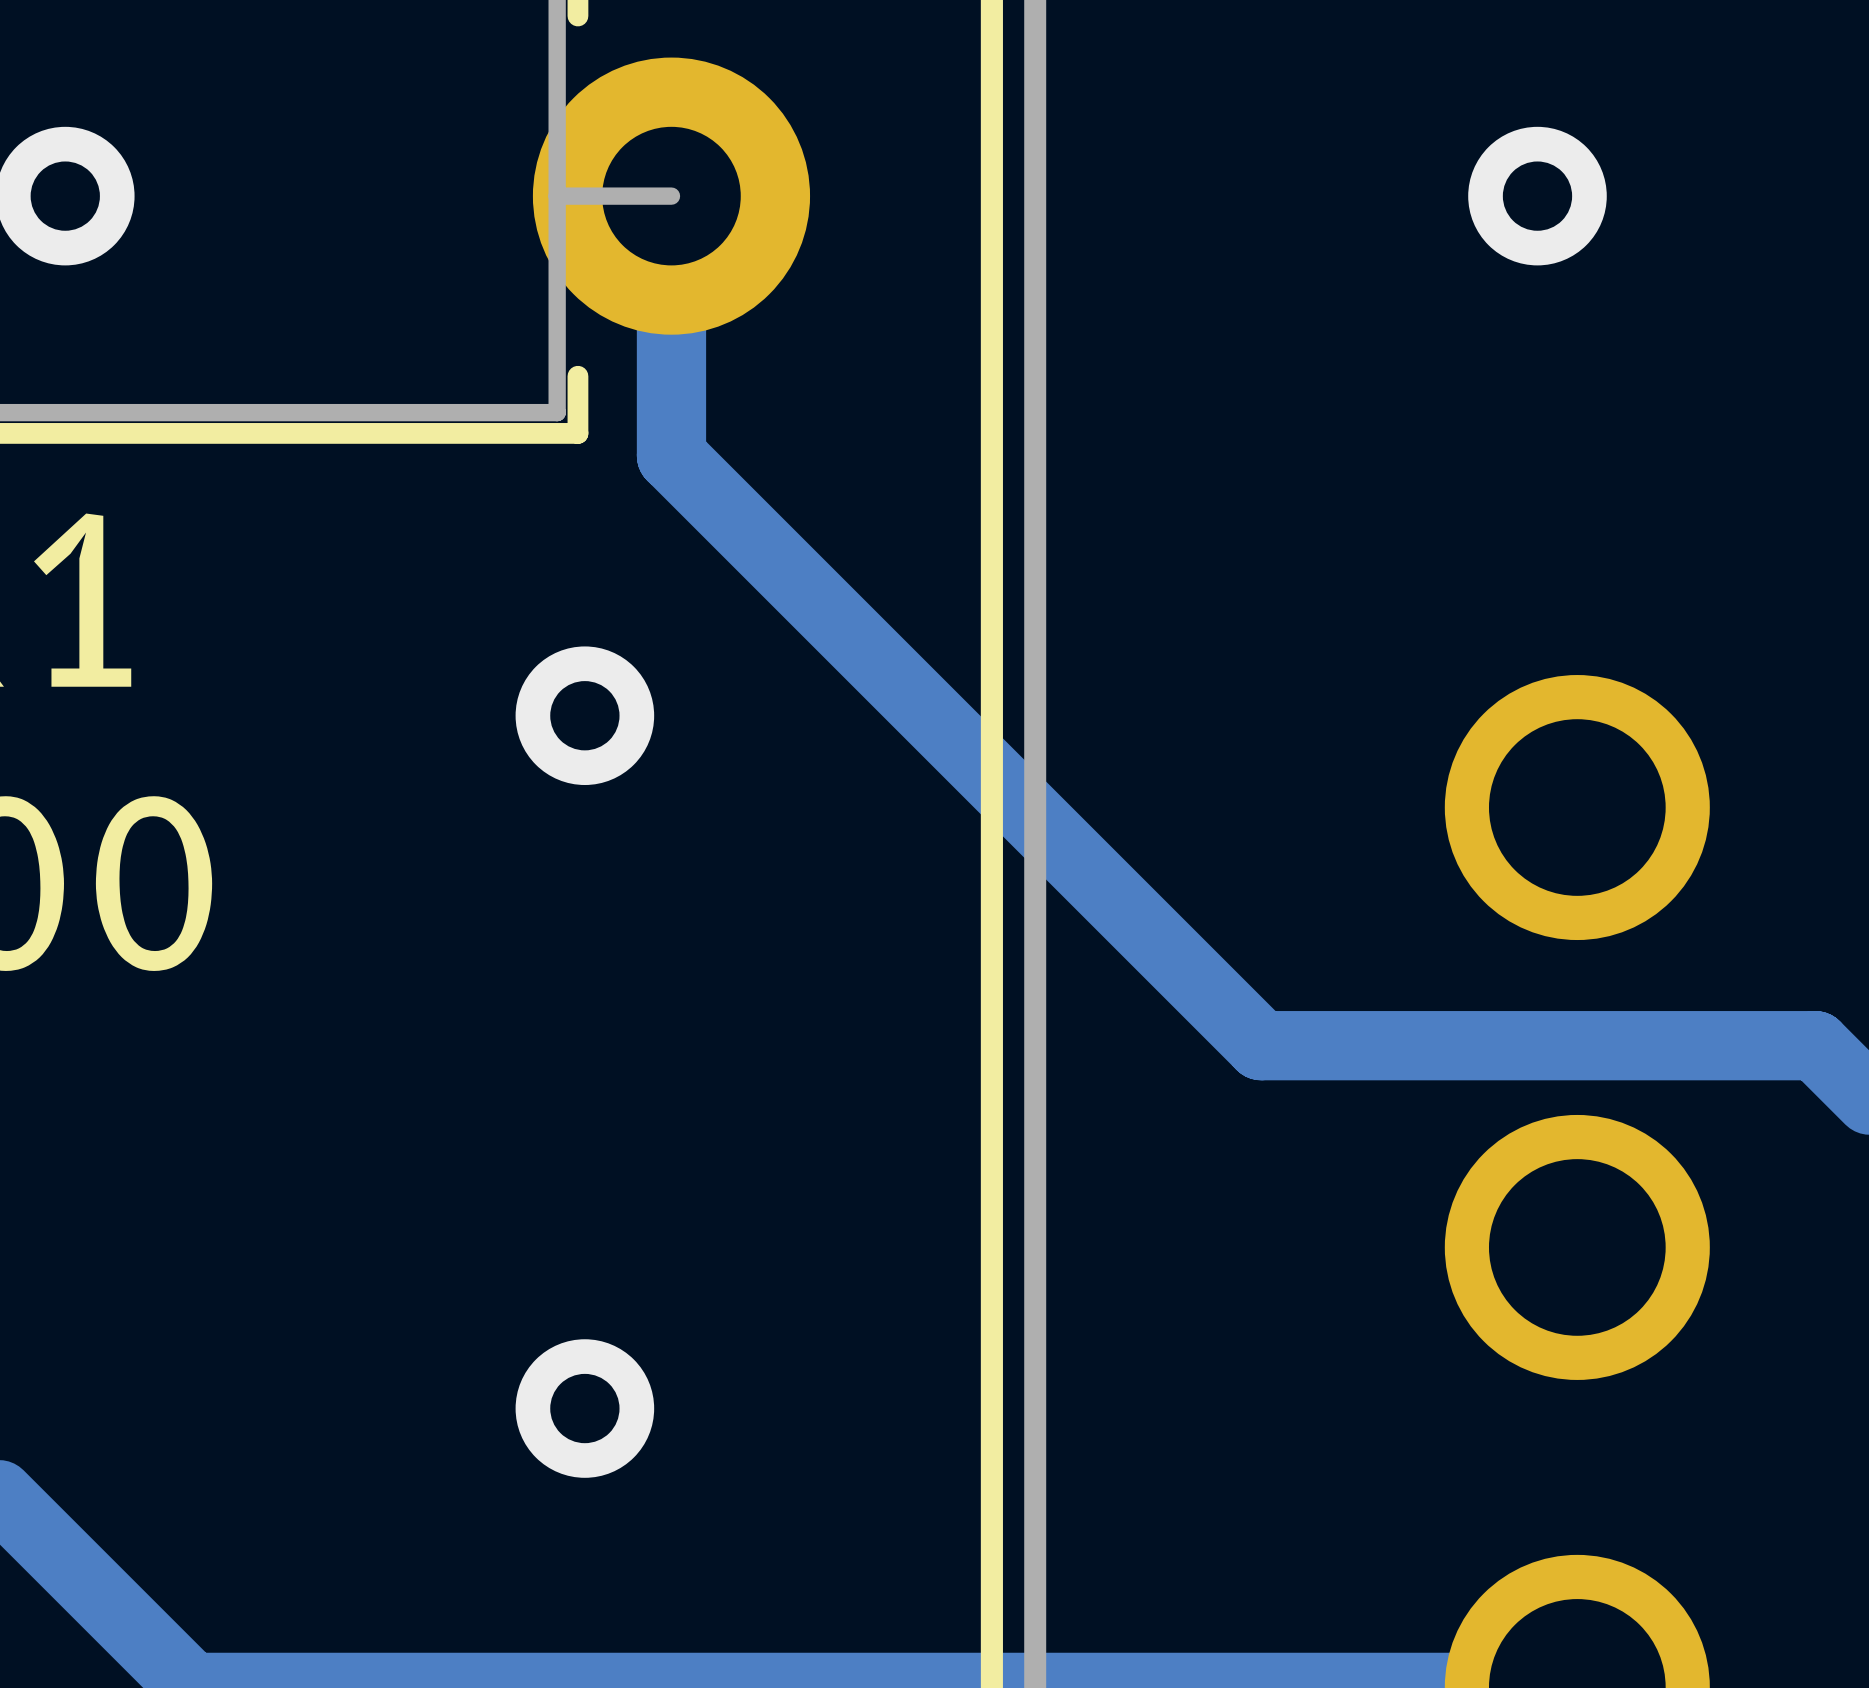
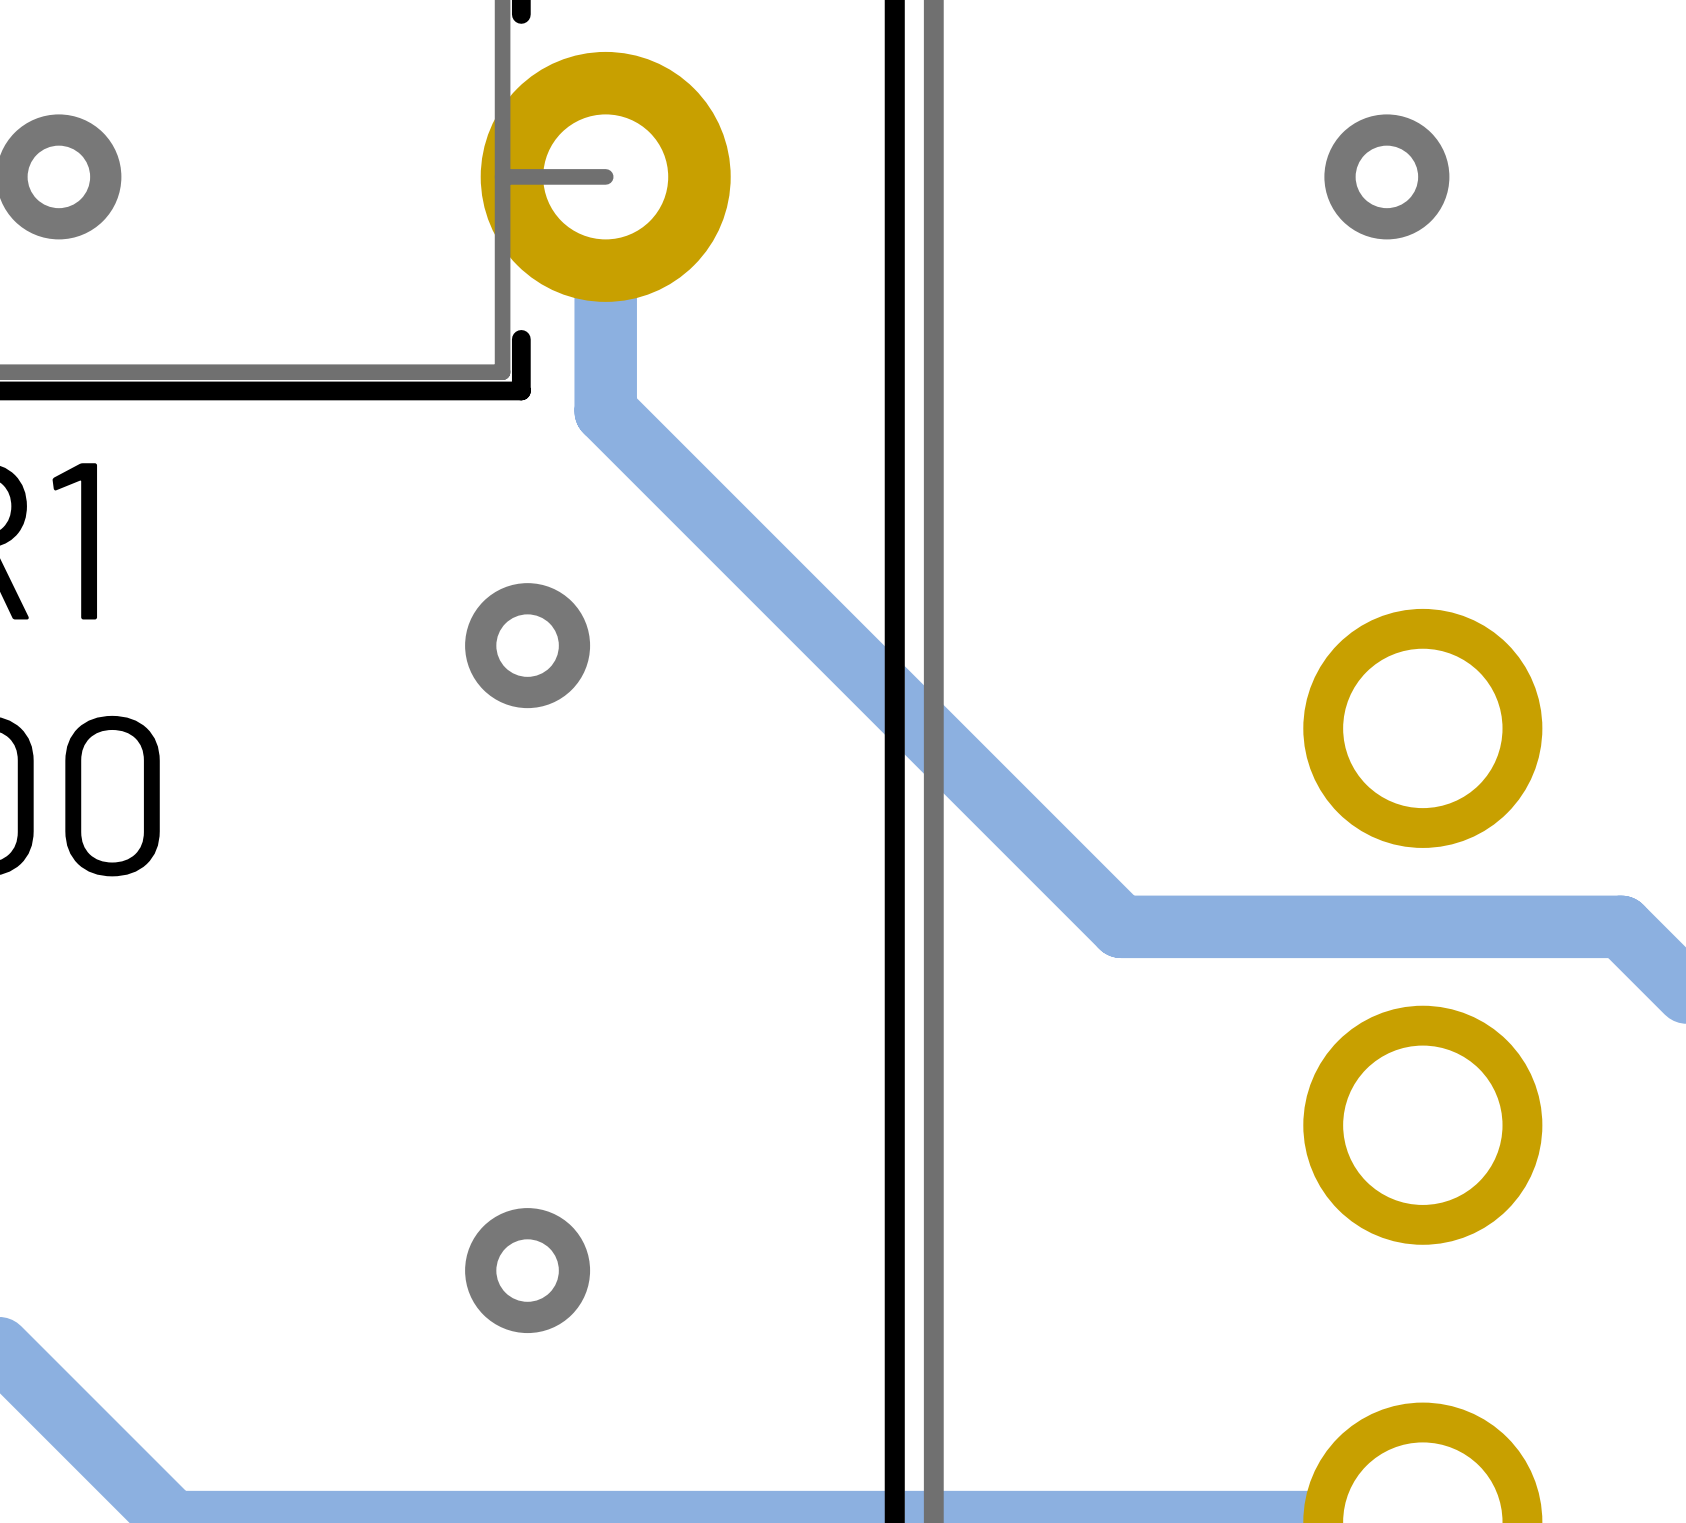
bottom track: (1243, 1027) (1261, 1045) (1815, 1045) -> (1121, 926) (1621, 926) (1637, 943)

